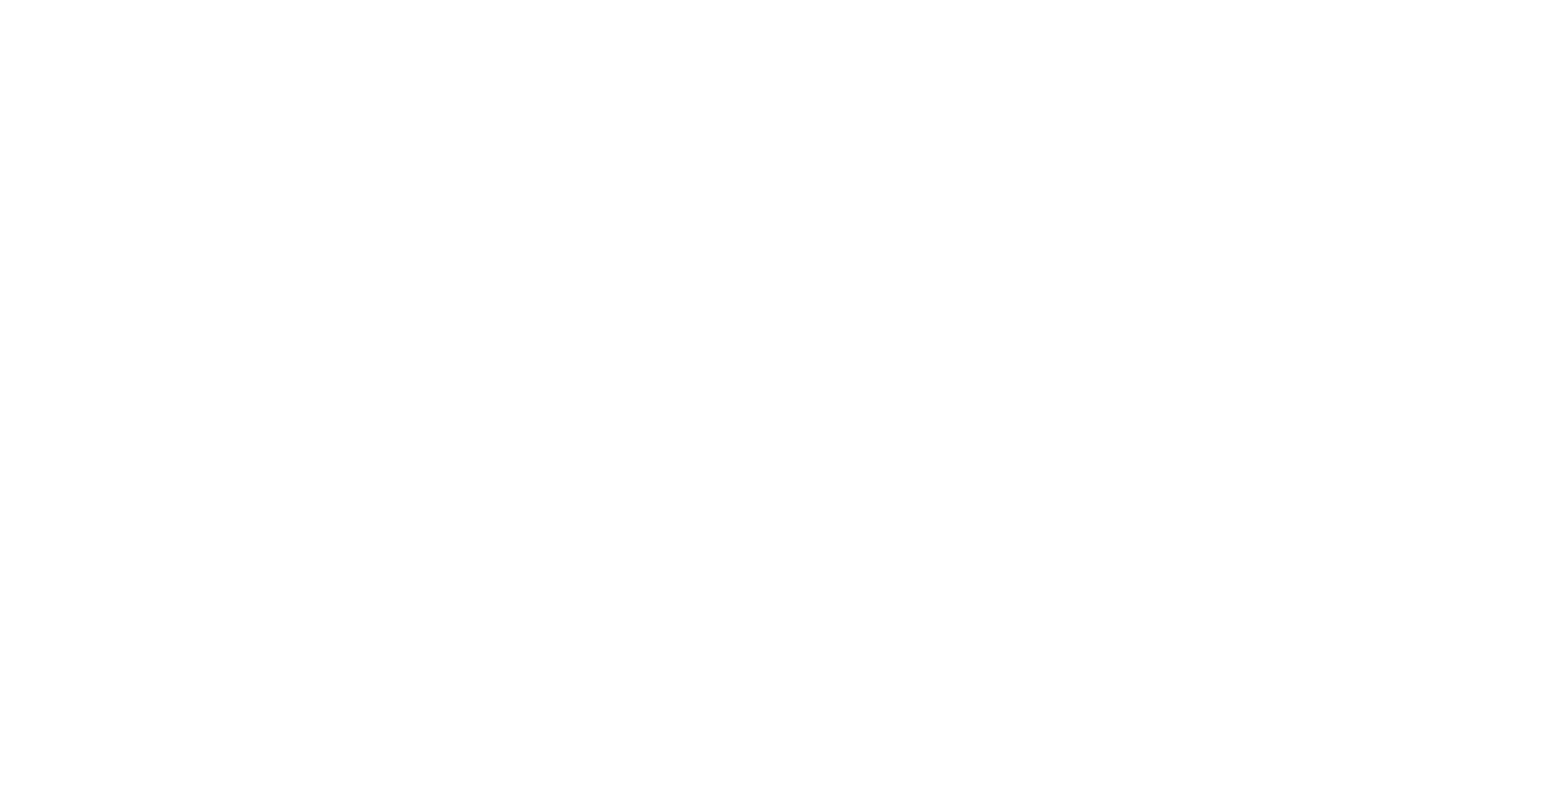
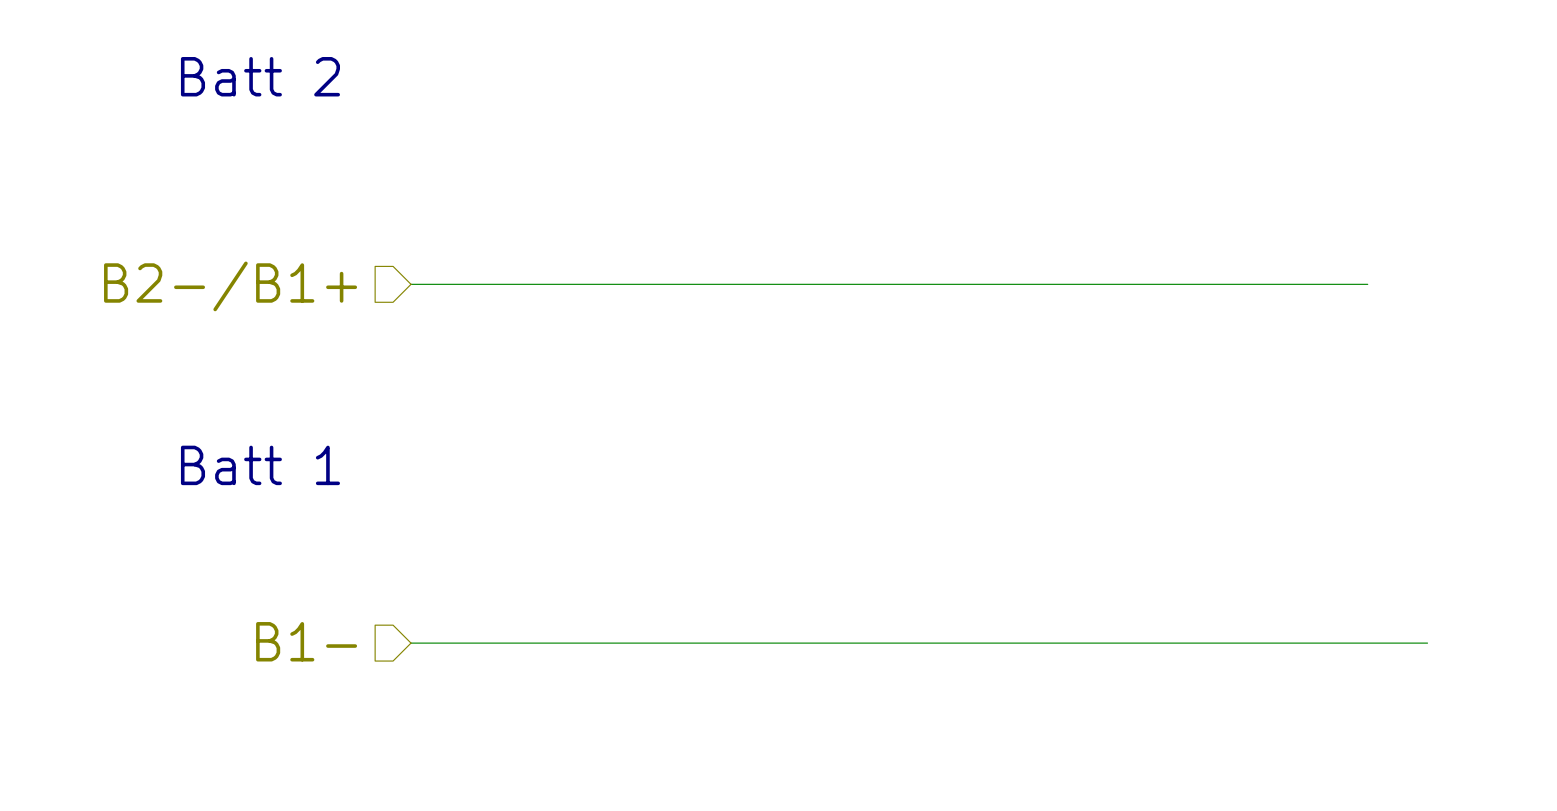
text: none -> Batt 2 (260, 76)
wire: none -> (411, 284) (1367, 284)
hierarchical label: none -> B2-/B1+ (230, 286)
text: none -> Batt 1 (260, 465)
hierarchical label: none -> B1- (306, 641)
wire: none -> (411, 643) (1427, 643)

